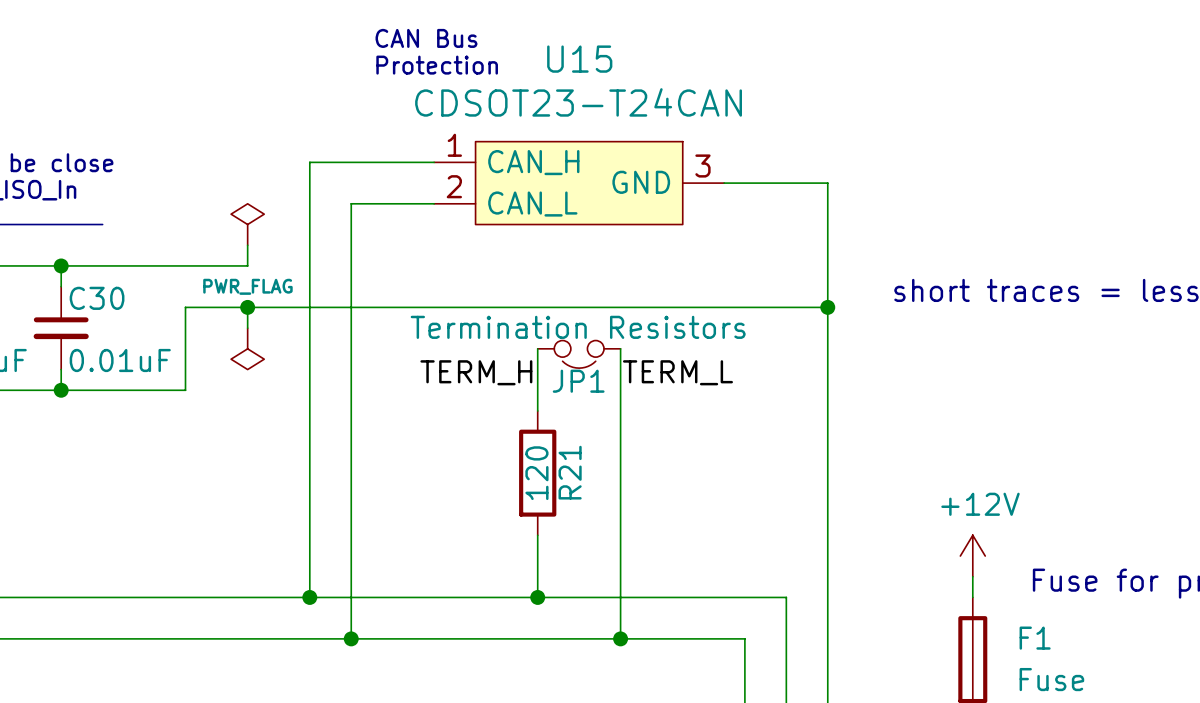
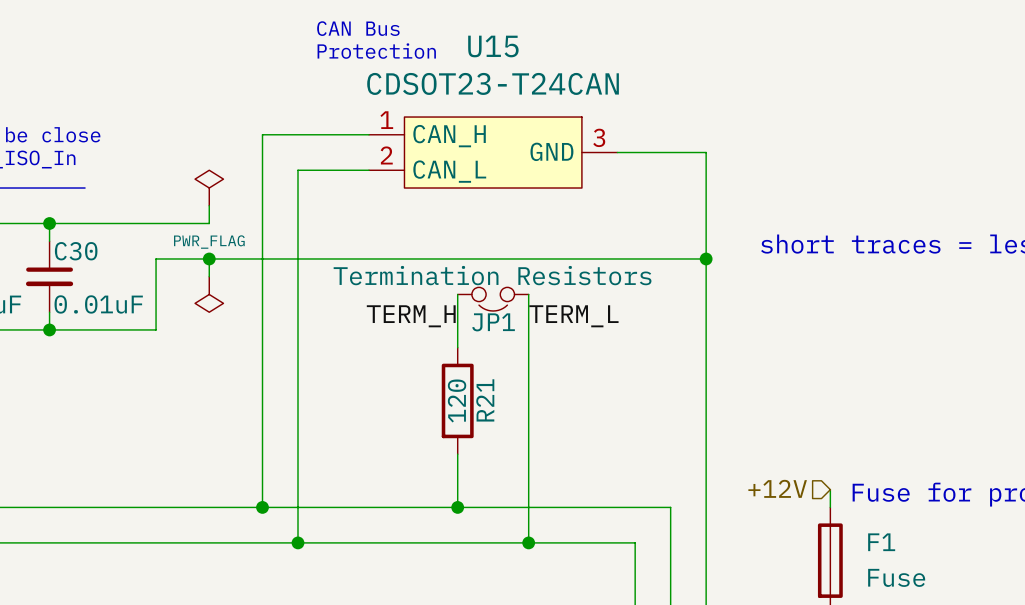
power symbol: +12V (972, 556) -> none
hierarchical label: none -> +12V (777, 488)

